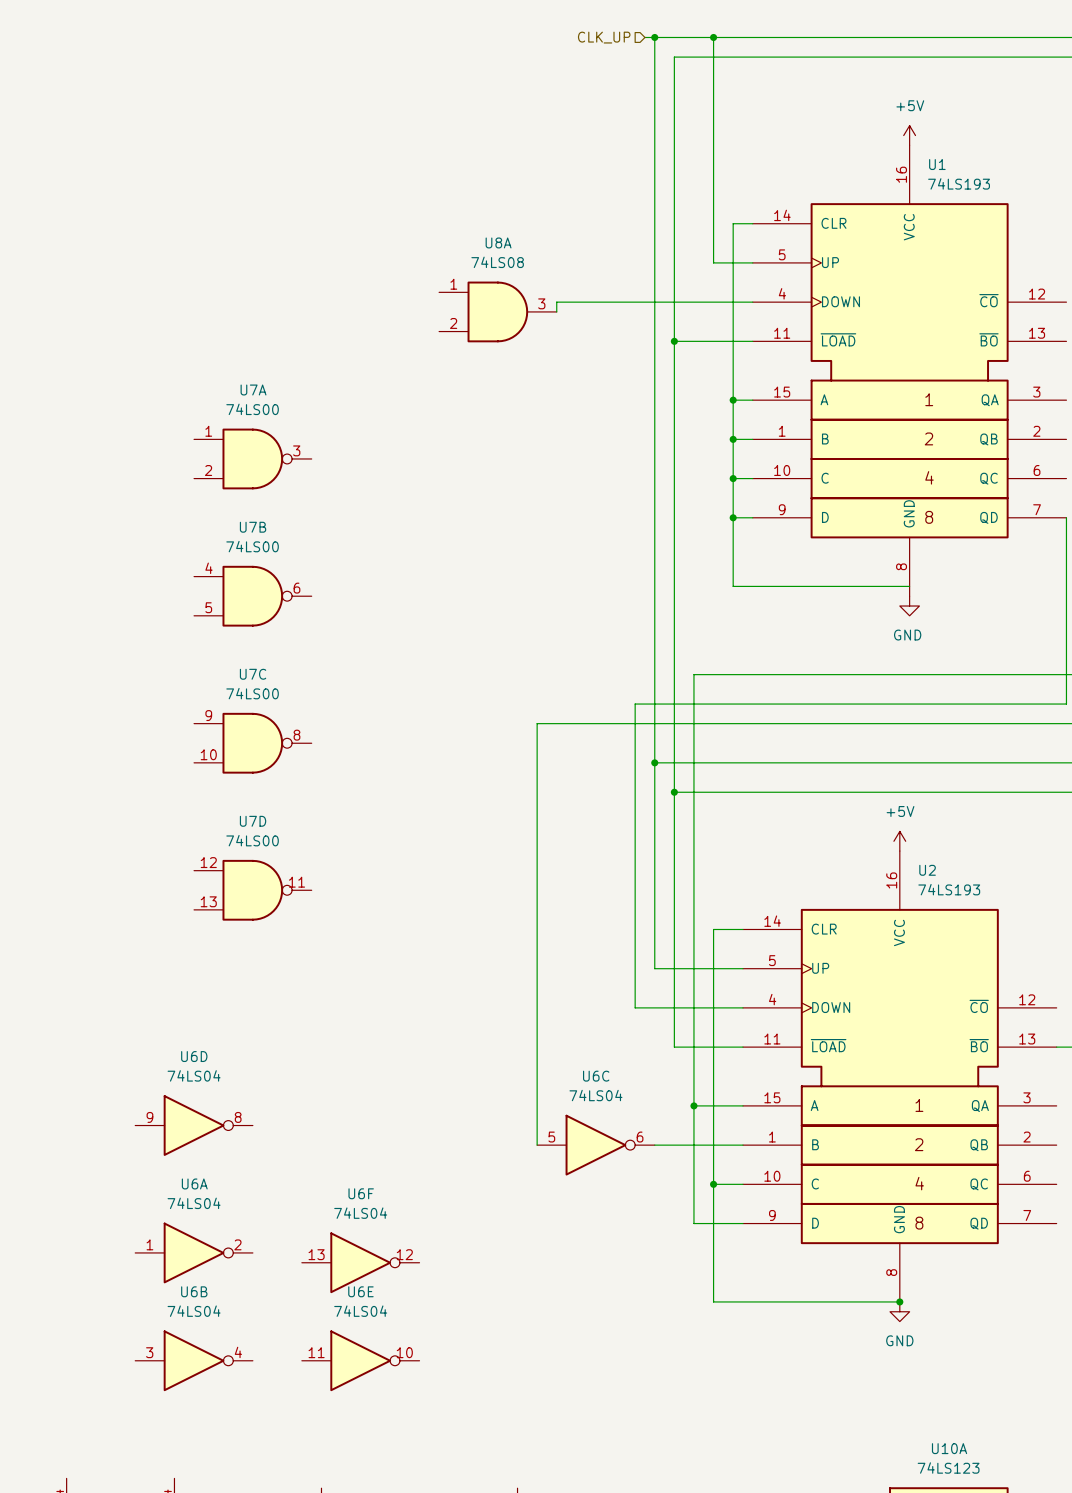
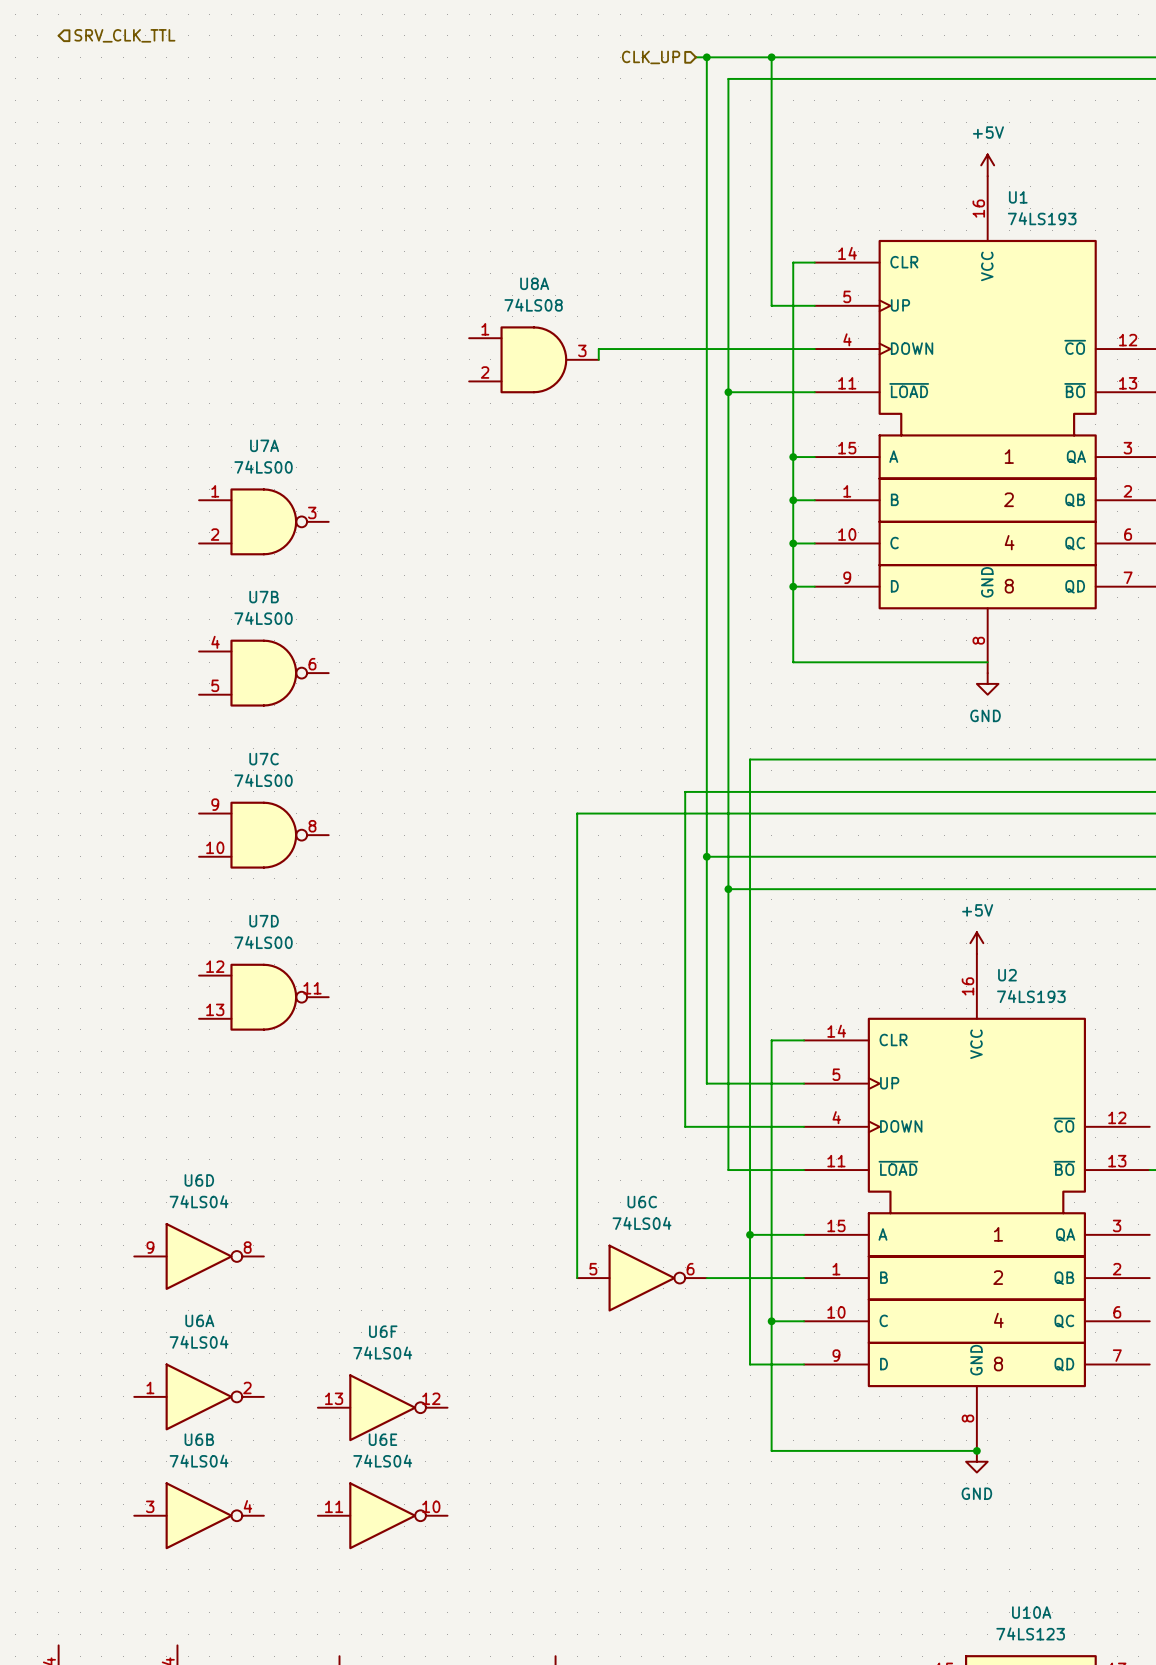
hierarchical label: none -> SRV_CLK_TTL (124, 35)

